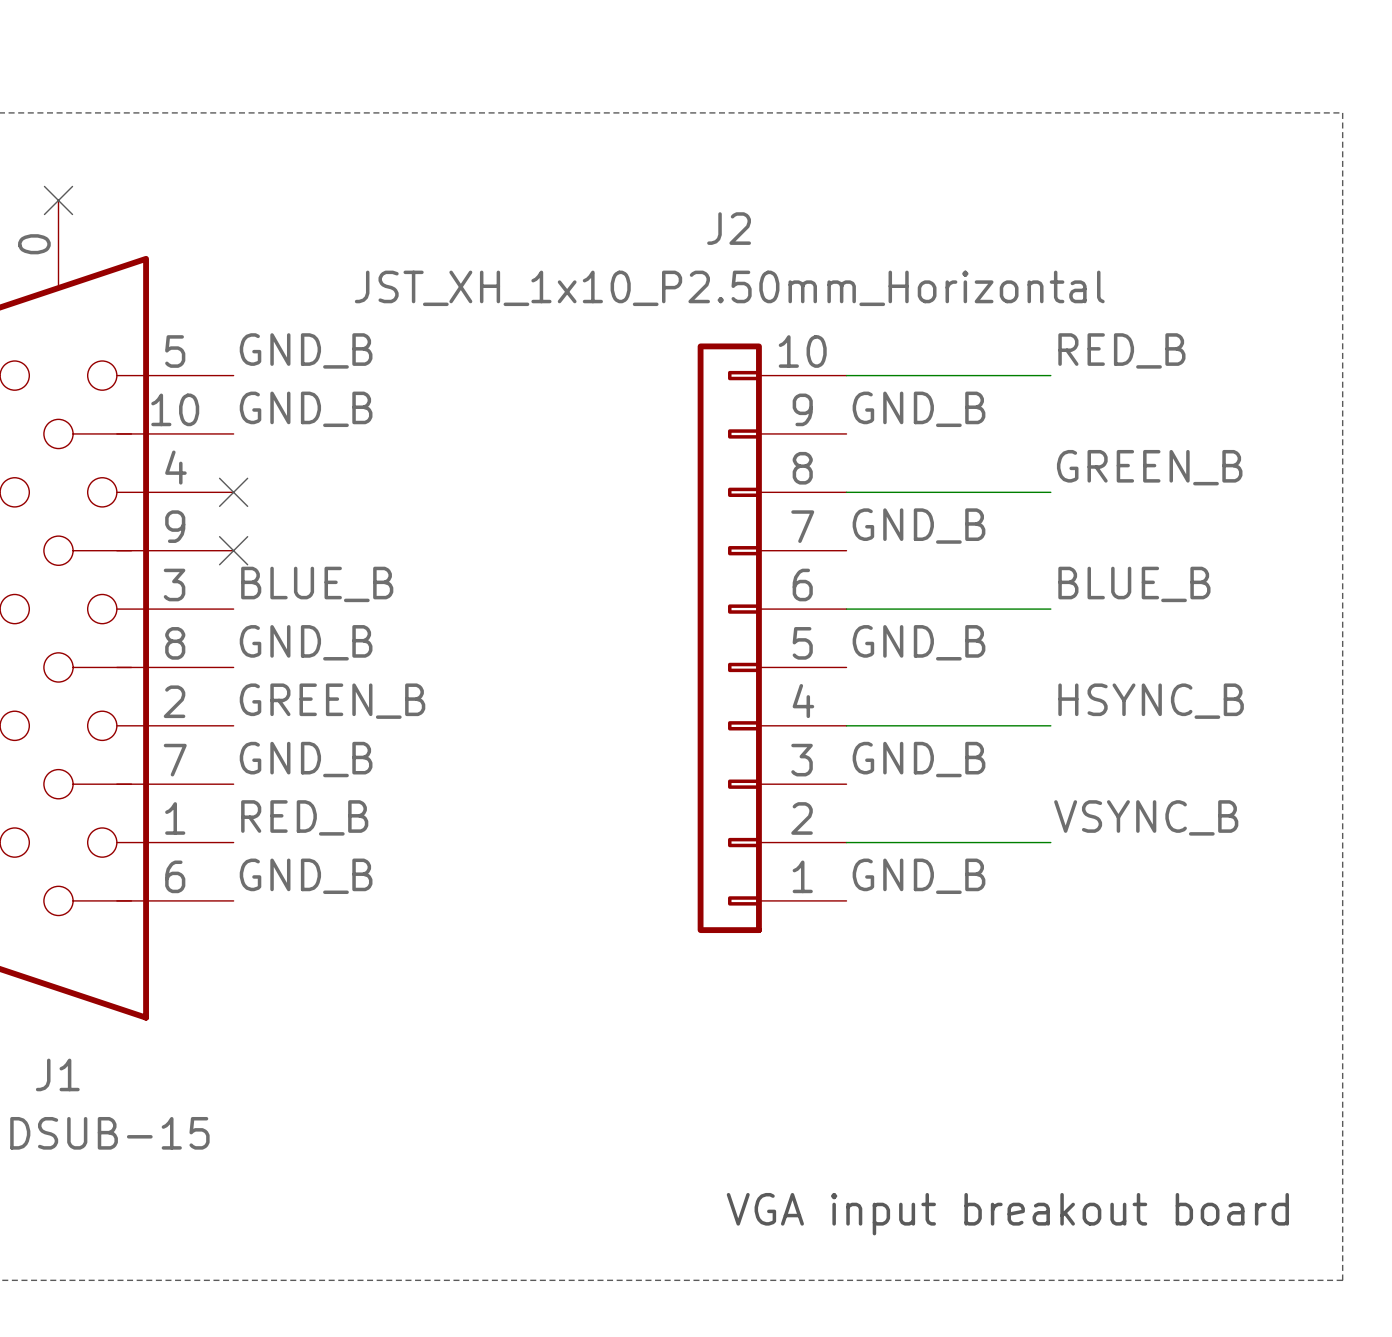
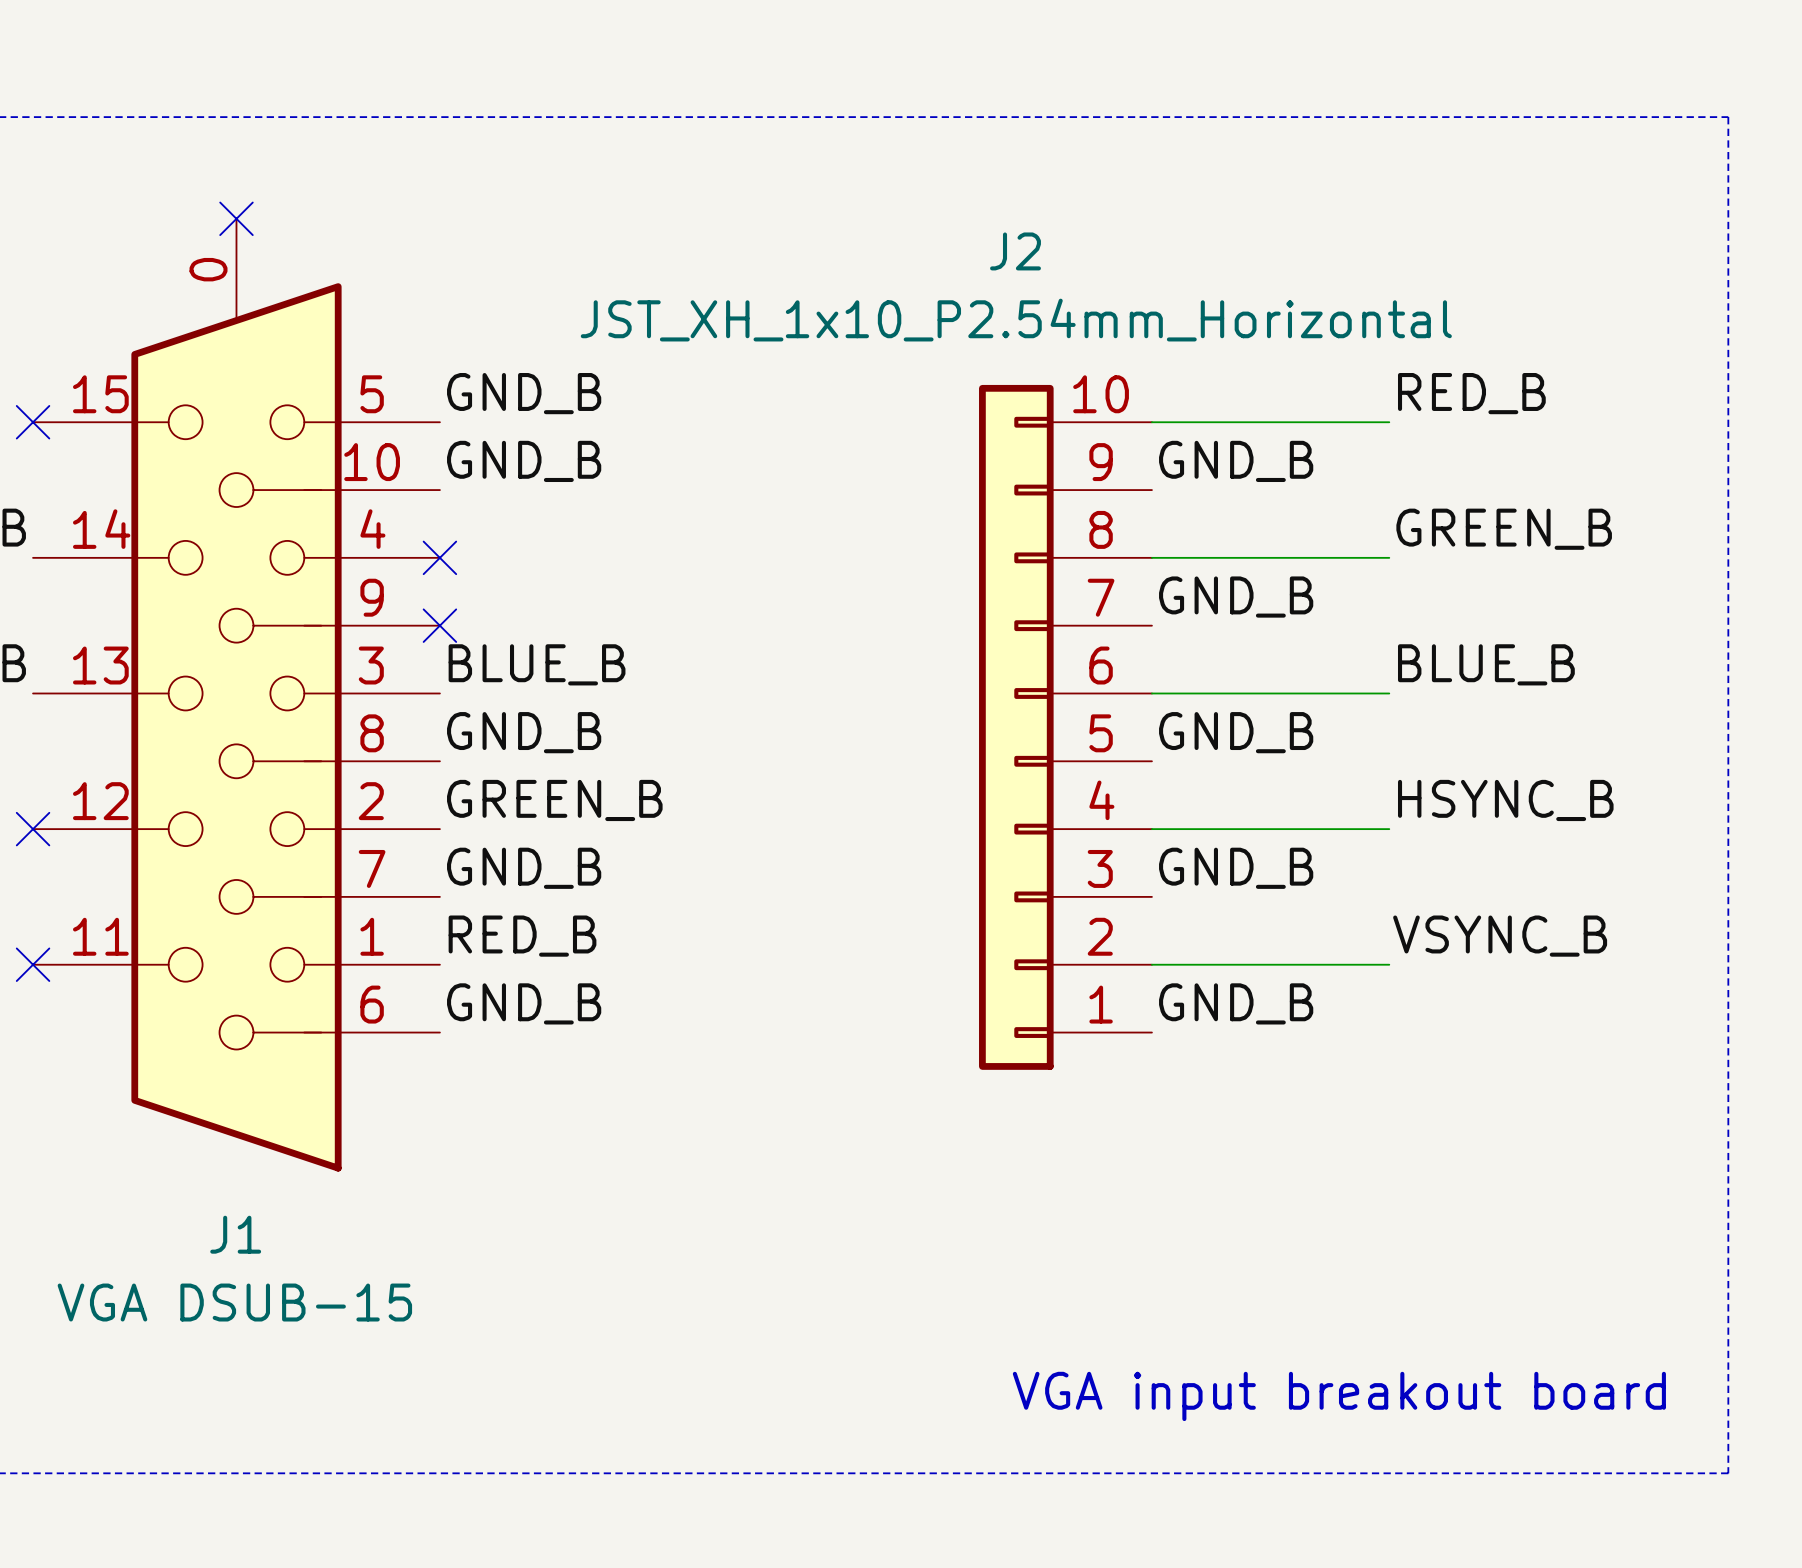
J2 value: JST_XH_1x10_P2.50mm_Horizontal (729, 288) -> JST_XH_1x10_P2.54mm_Horizontal (1016, 320)

